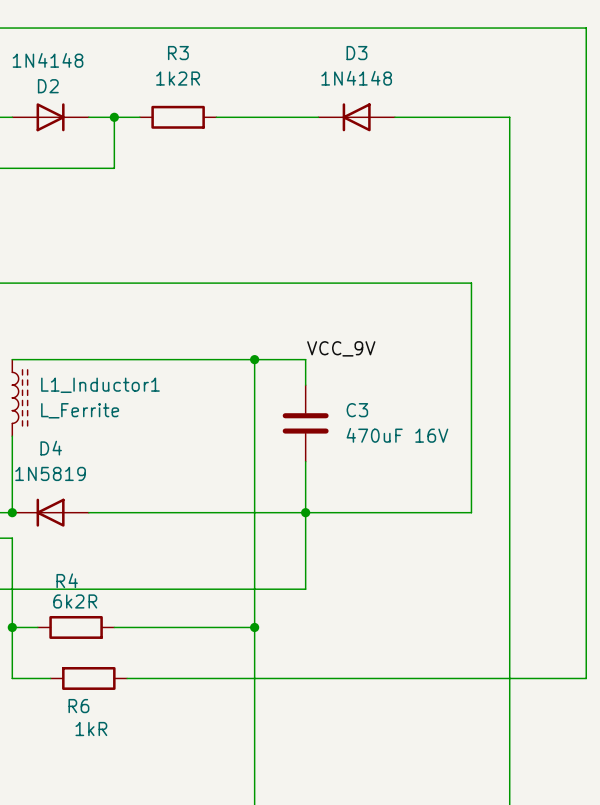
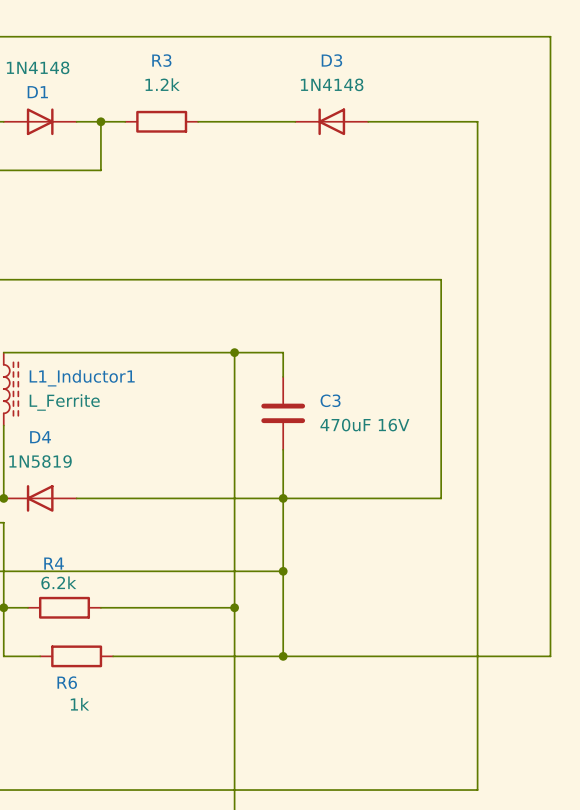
R3 value: 1k2R (178, 78) -> 1.2k (162, 84)
D2 name: D2 (48, 86) -> D1 (37, 92)
label: VCC_9V (341, 348) -> none
wire: none -> (283, 571) (283, 656)
junction: none -> (283, 571)
R4 value: 6k2R (75, 601) -> 6.2k (58, 582)
junction: none -> (283, 656)
R6 value: 1kR (91, 729) -> 1k (79, 704)

